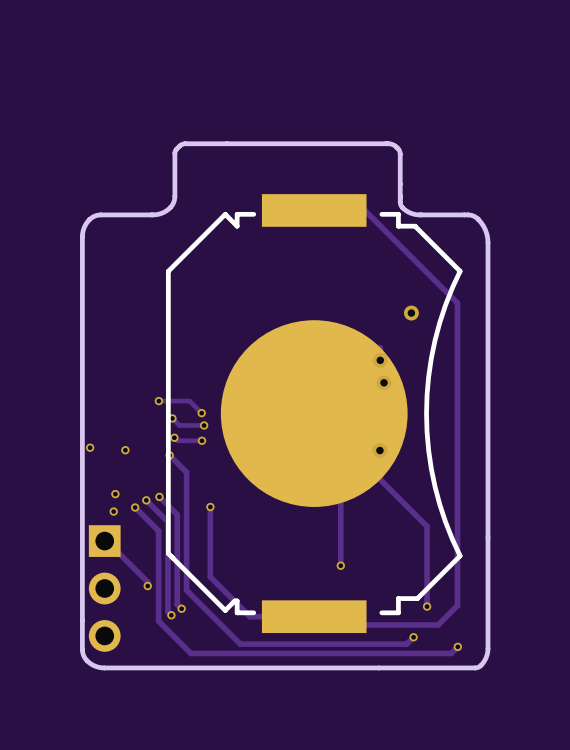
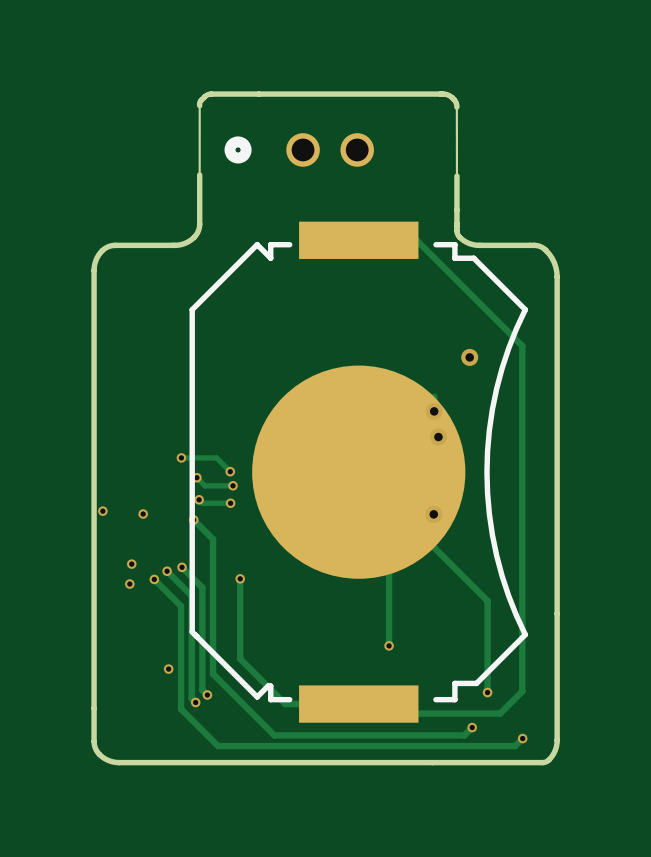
part: none -> (299, 149)
board edge: (174, 153) (180, 145) (185, 143) (388, 143) (395, 146) (400, 154) -> (199, 174) (199, 103) (208, 94) (443, 94) (451, 97) (456, 105) (456, 176)
track: (104, 541) (147, 582) (147, 586) -> none
part: (104, 588) -> none

